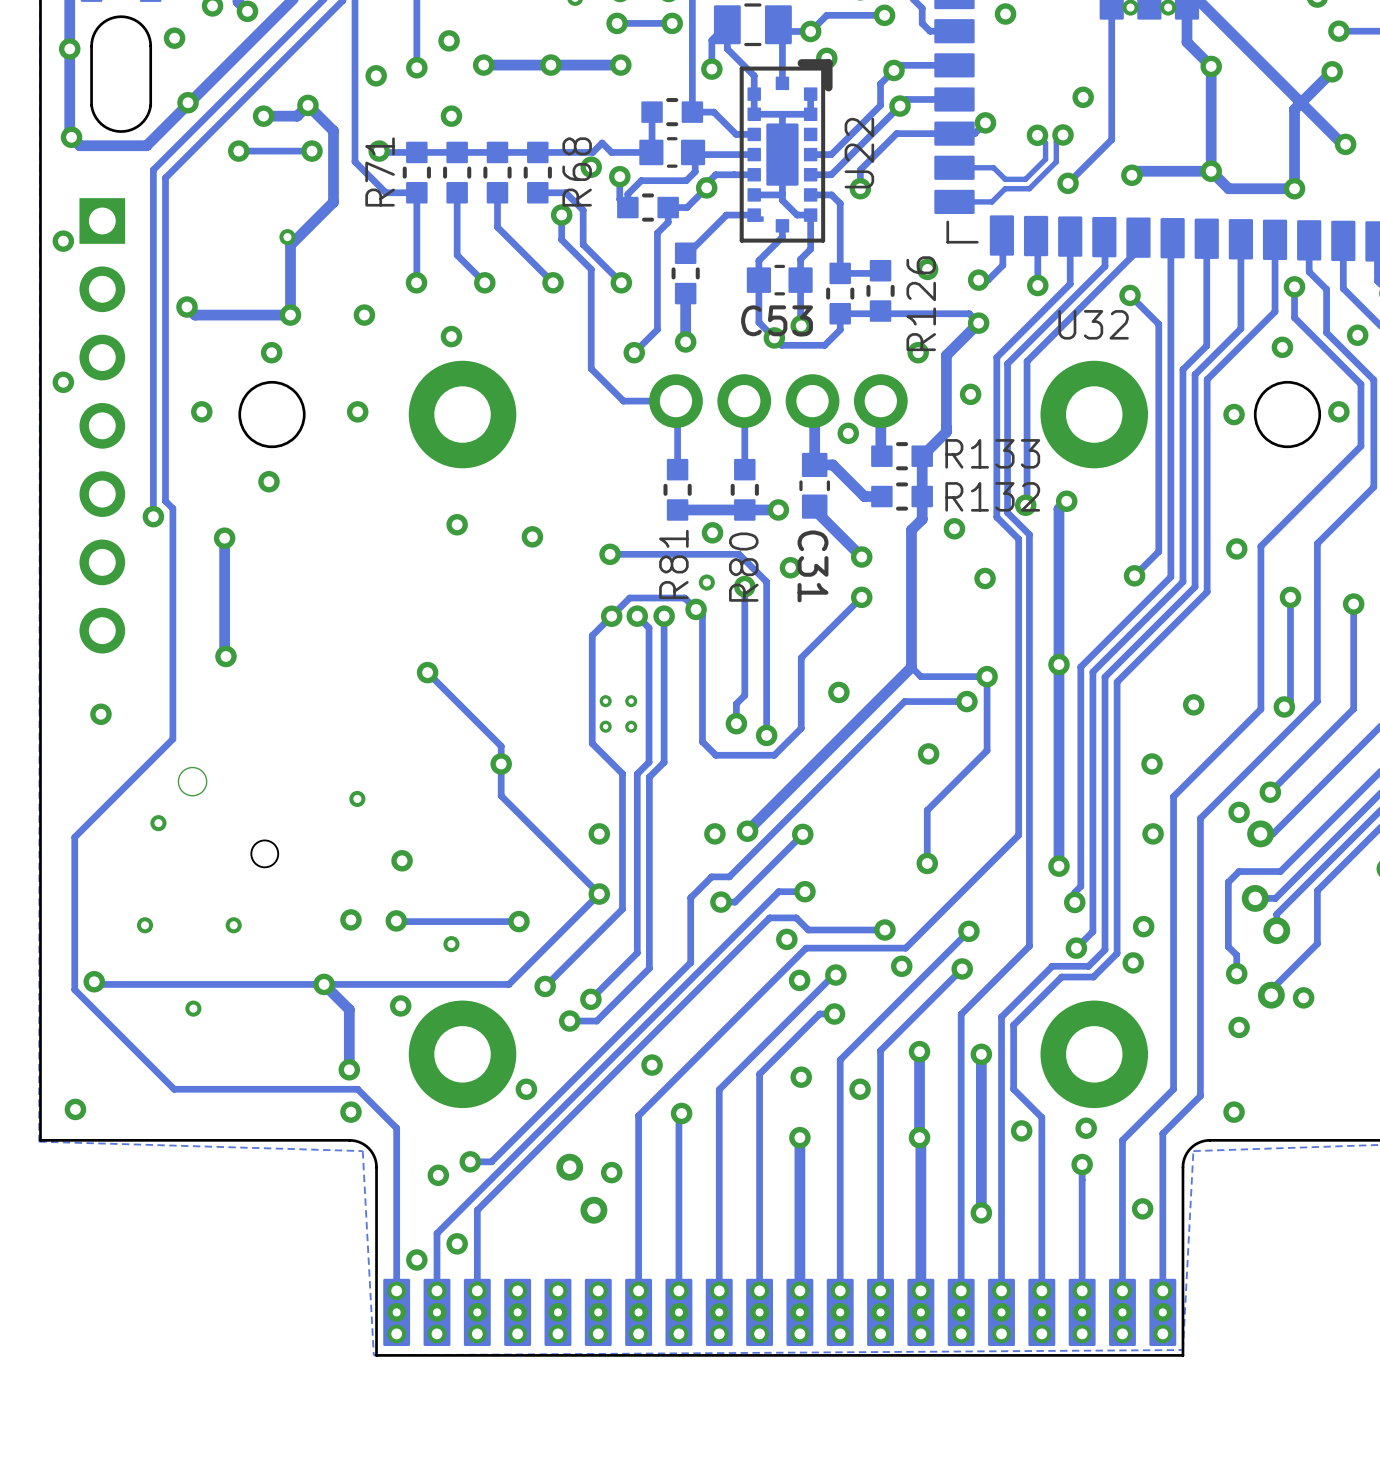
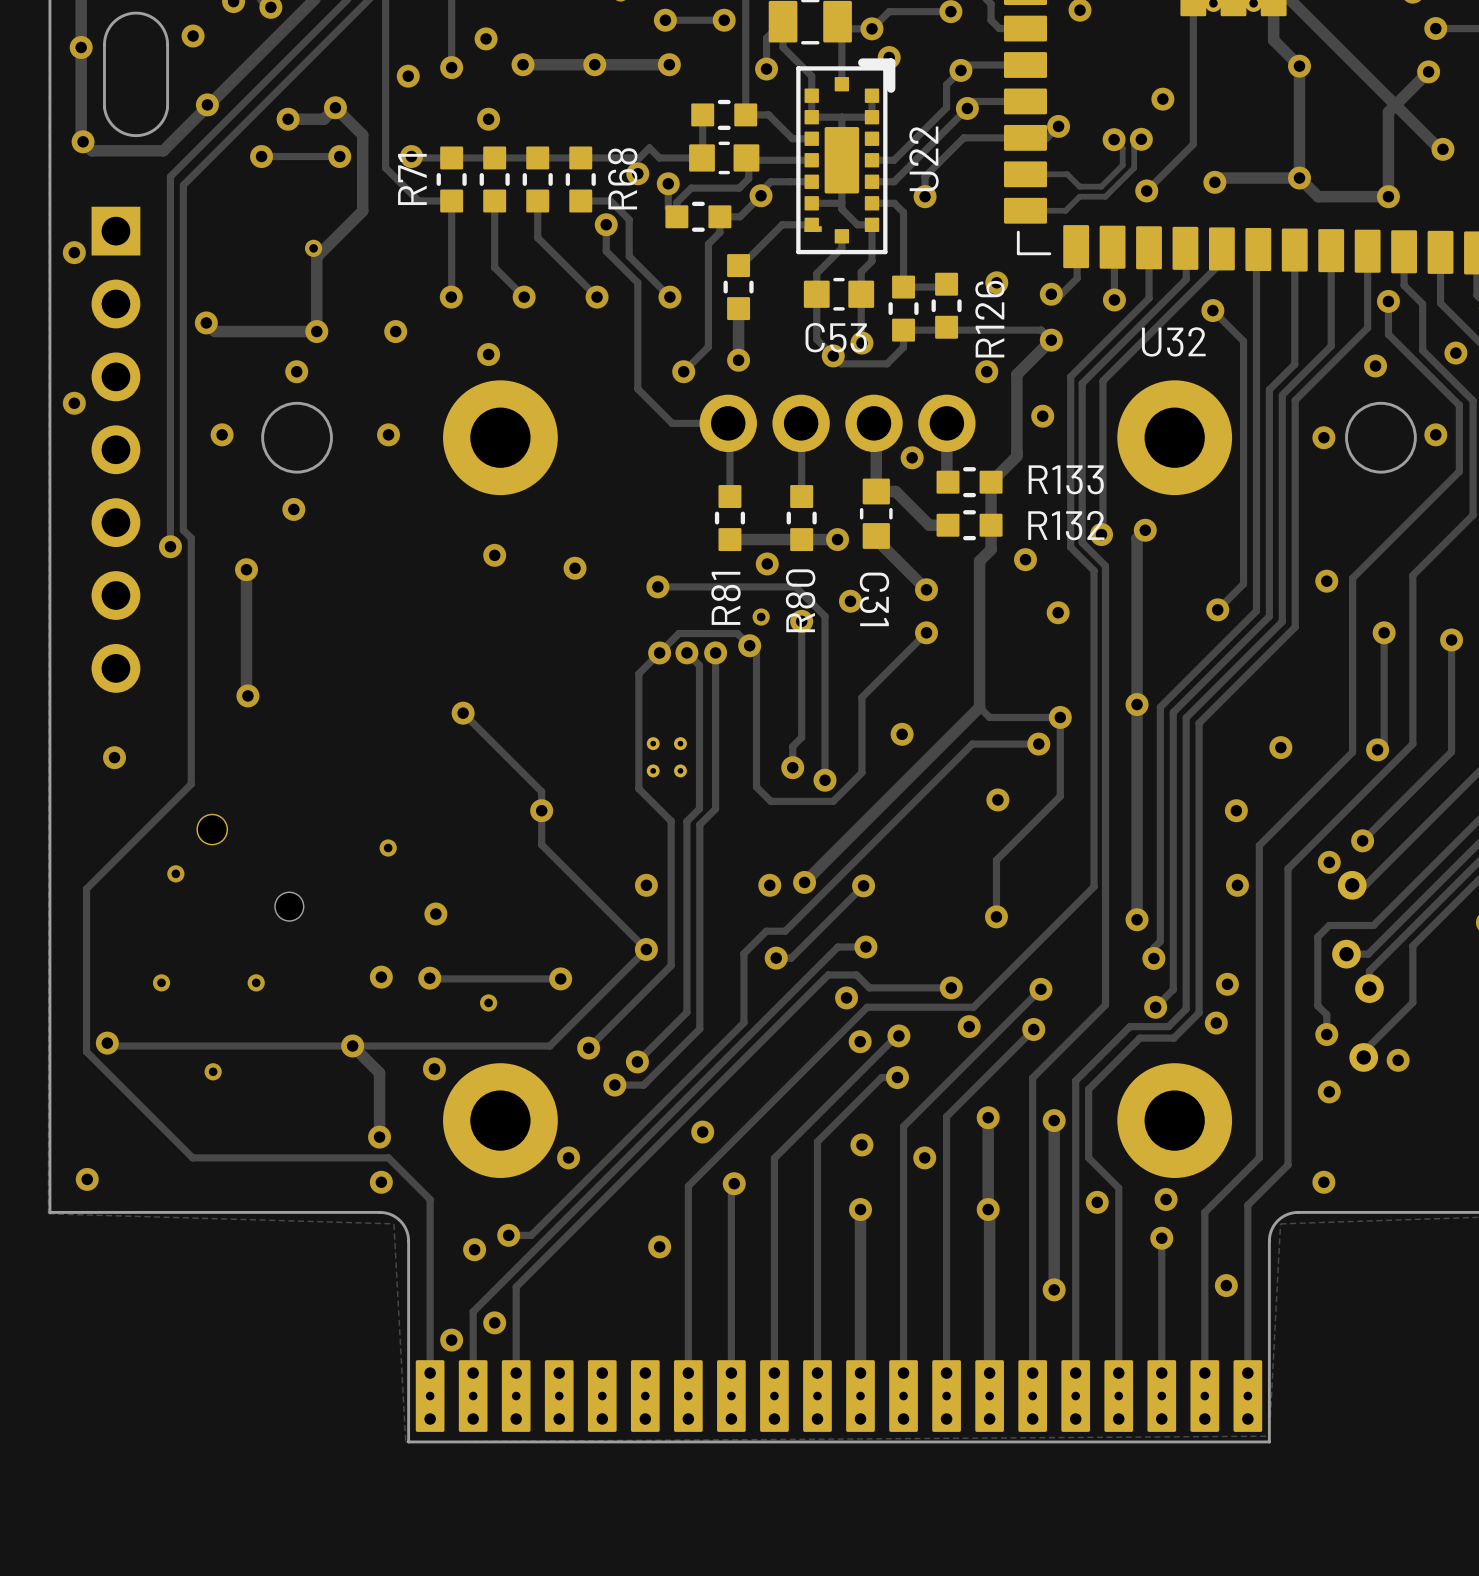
part: (569, 1167) -> none
part: (593, 1210) -> none

